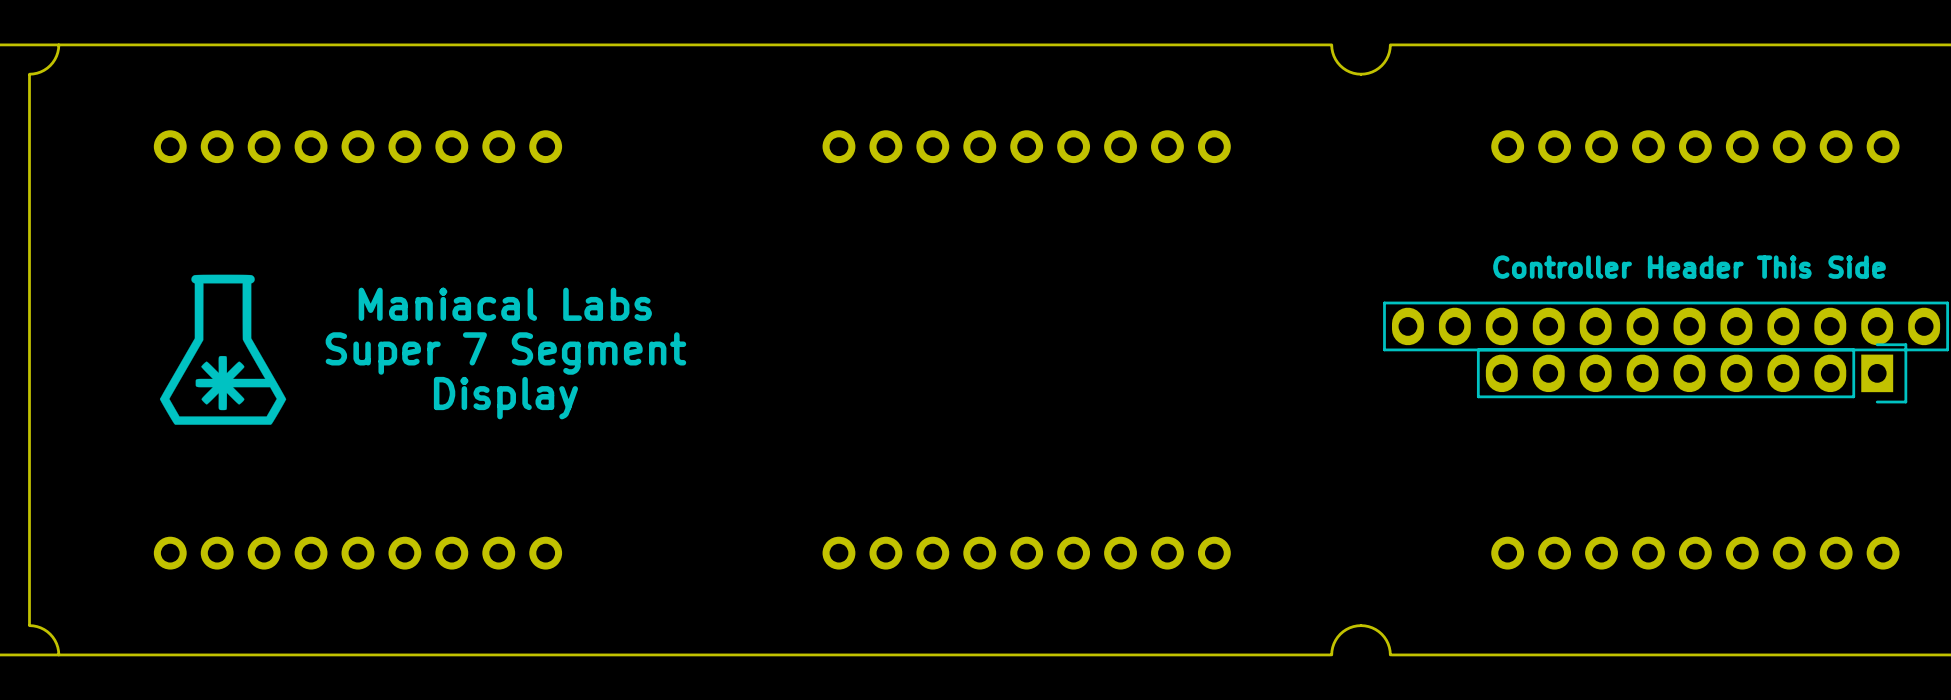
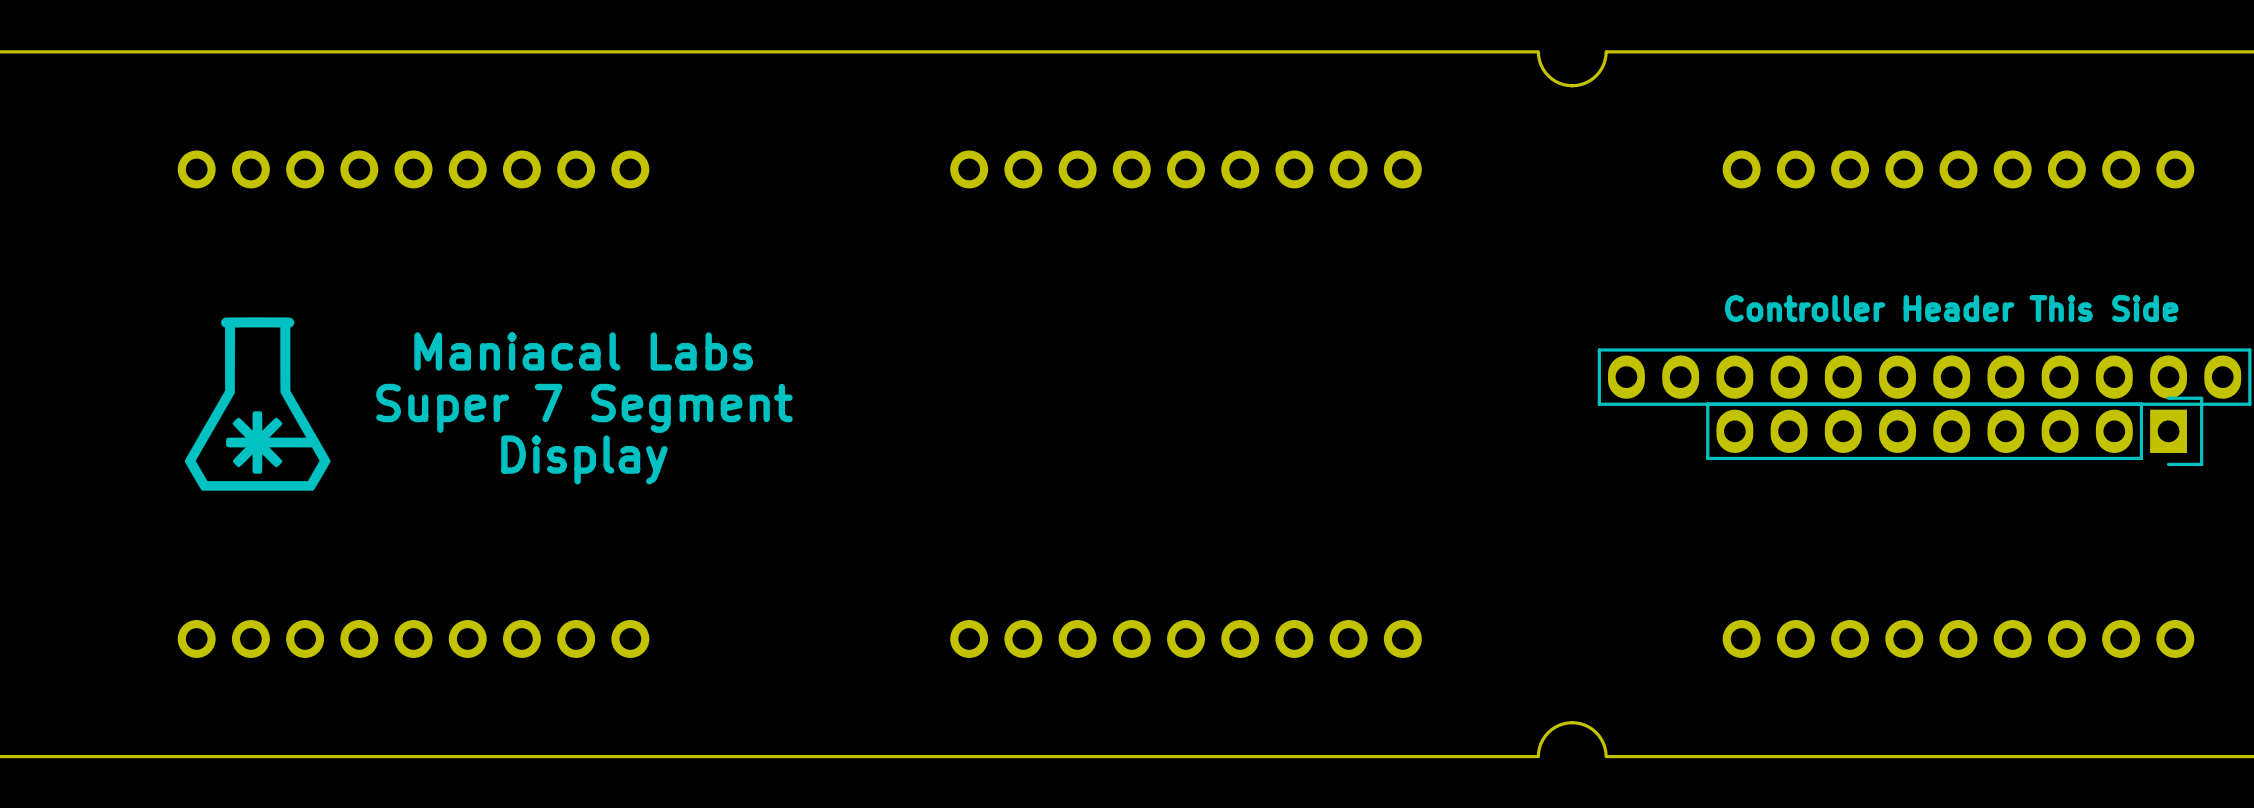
board edge: (58, 44) (56, 56) (50, 65) (40, 71) (29, 74) -> none
board edge: (29, 75) (29, 624) -> none
board edge: (29, 625) (40, 627) (50, 634) (56, 643) (58, 654) -> none

